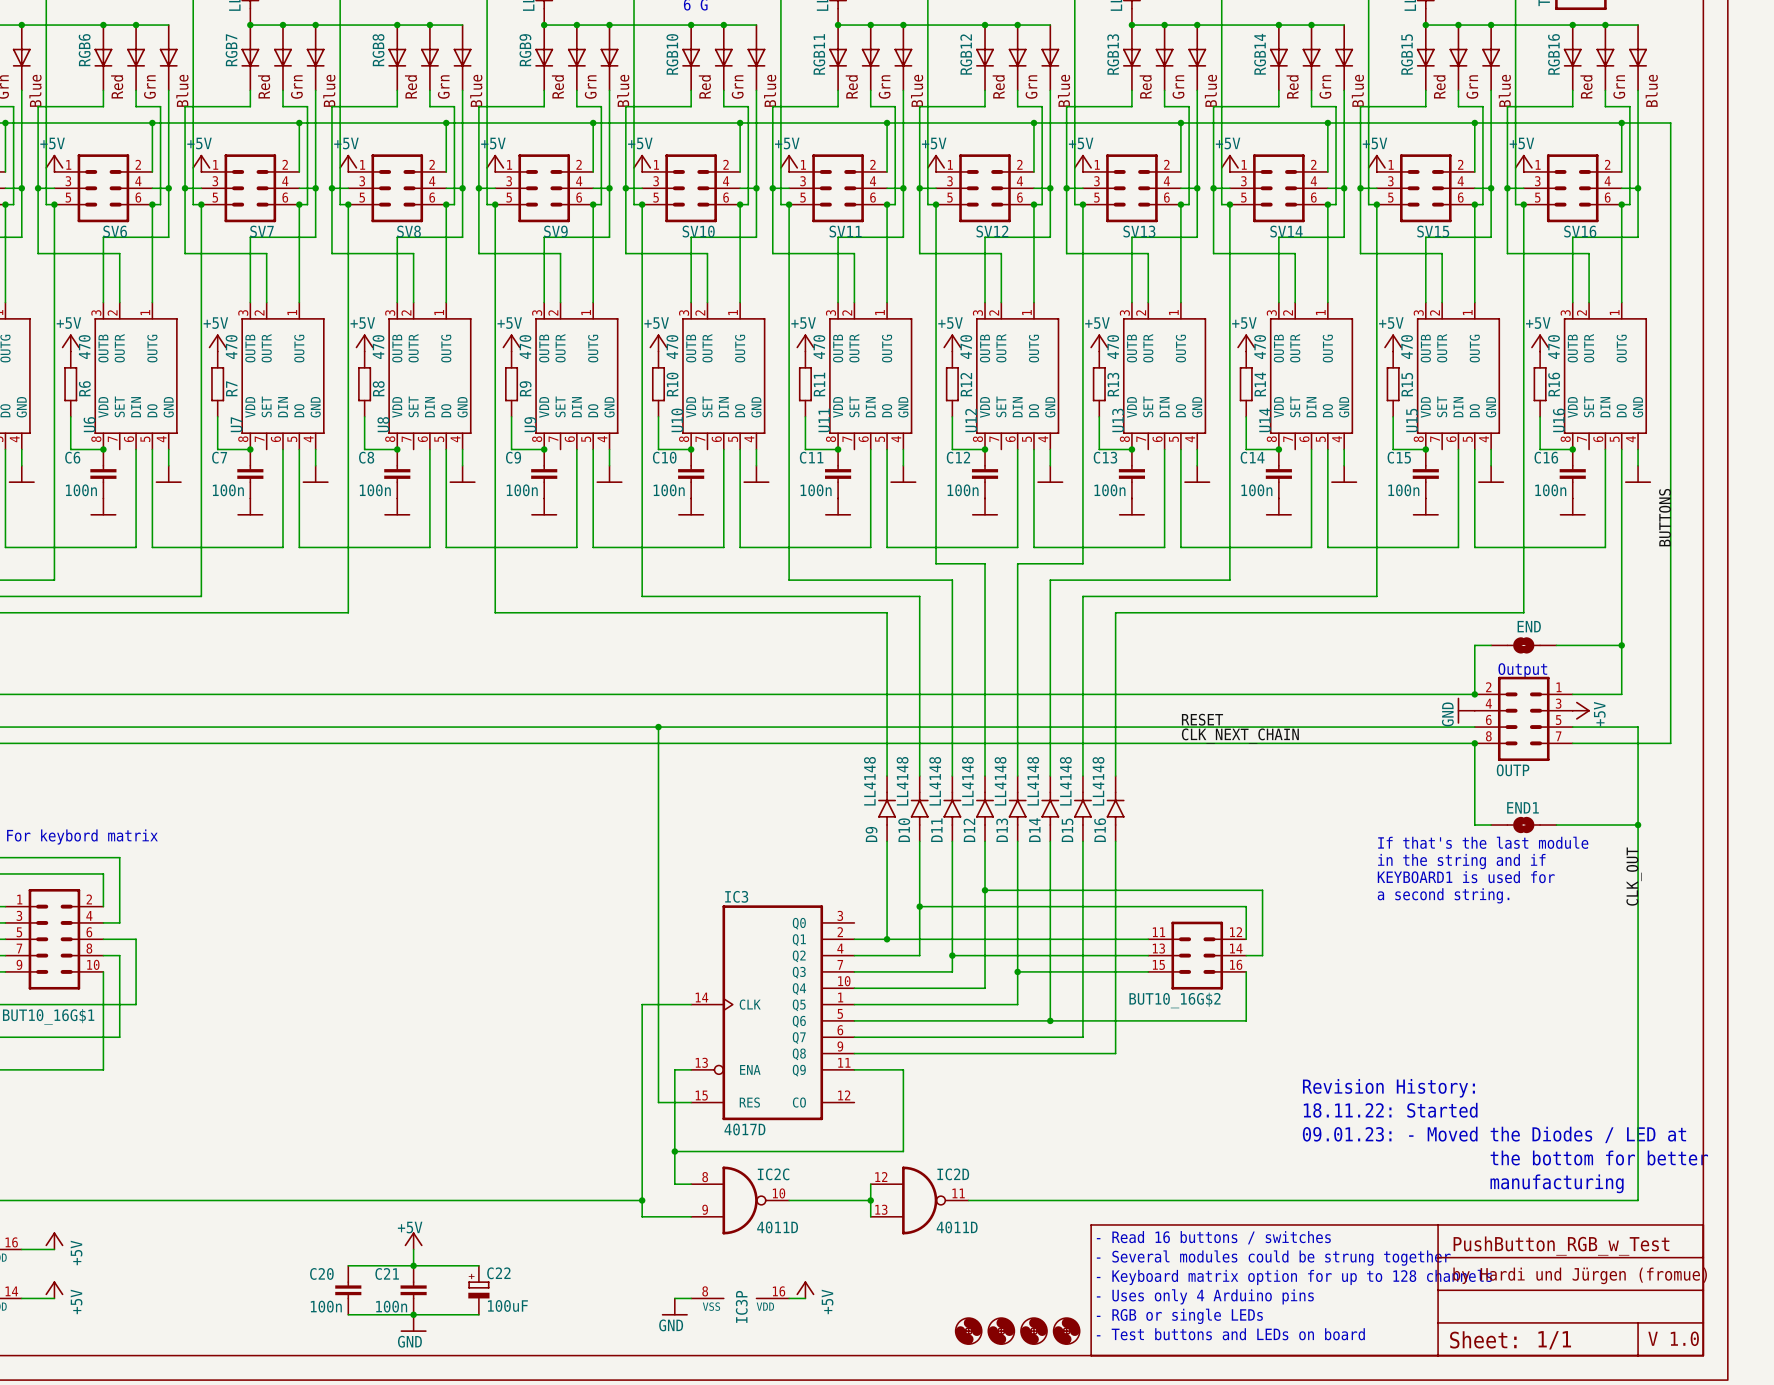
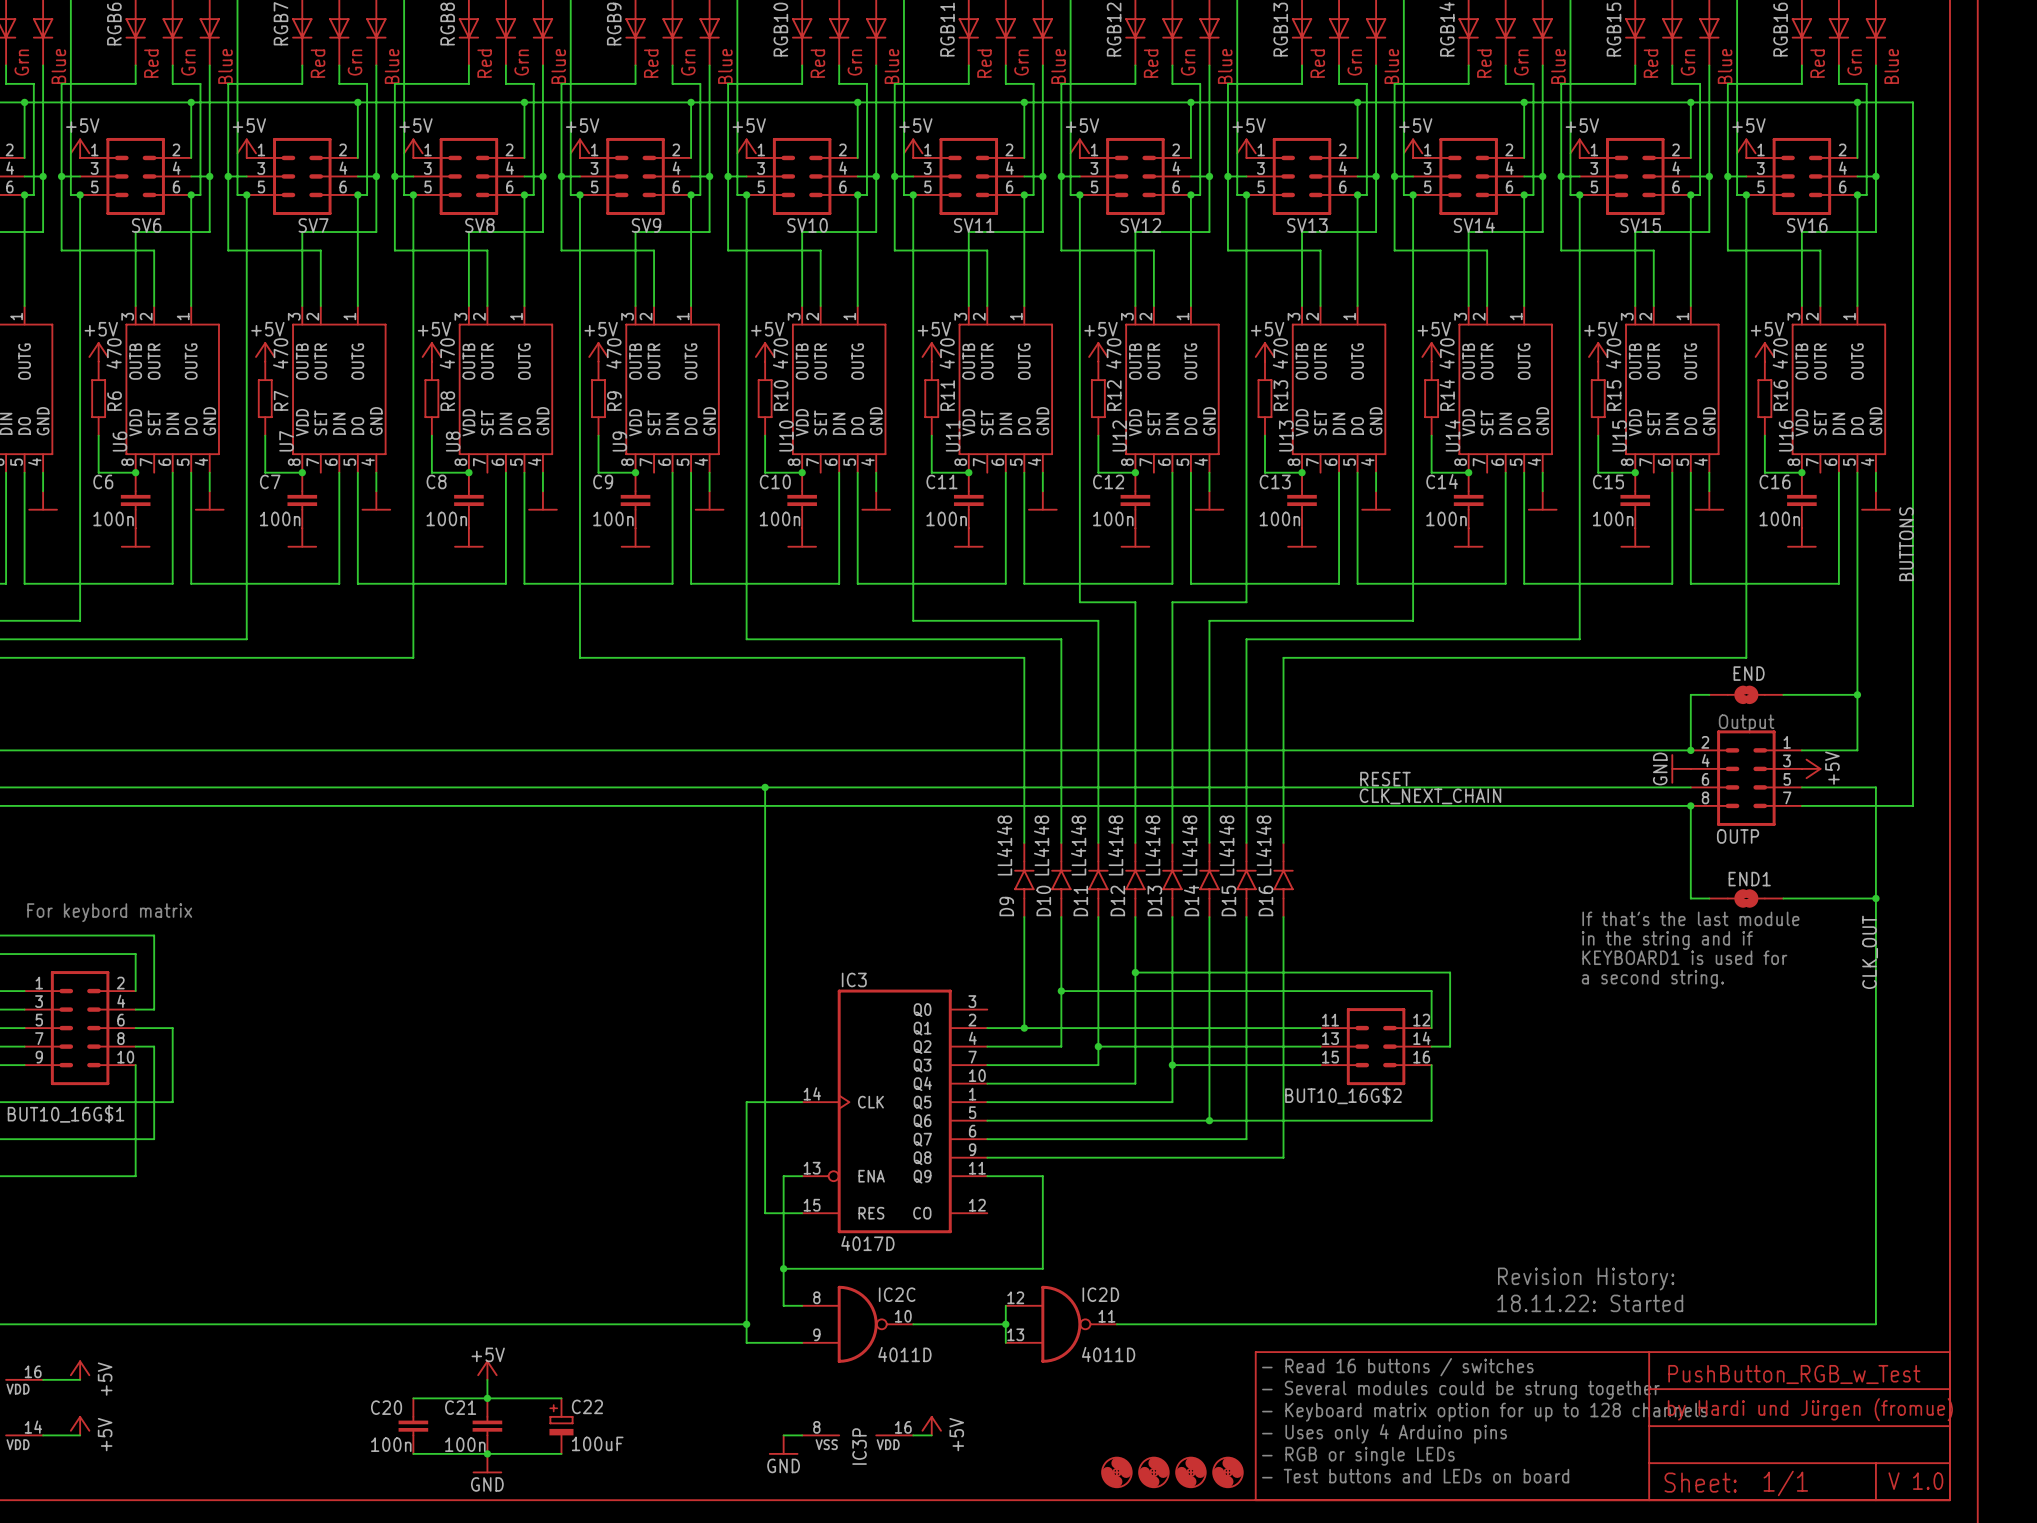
text: Revision History: (1388, 1088) -> none
text: 18.11.22: Started (1390, 1110) -> none
text: 09.01.23: - Moved the Diodes / LED at (1494, 1134) -> none
text: the bottom for better (1599, 1158) -> Revision History: (1586, 1278)
text: manufacturing (1557, 1183) -> 18.11.22: Started (1590, 1303)

